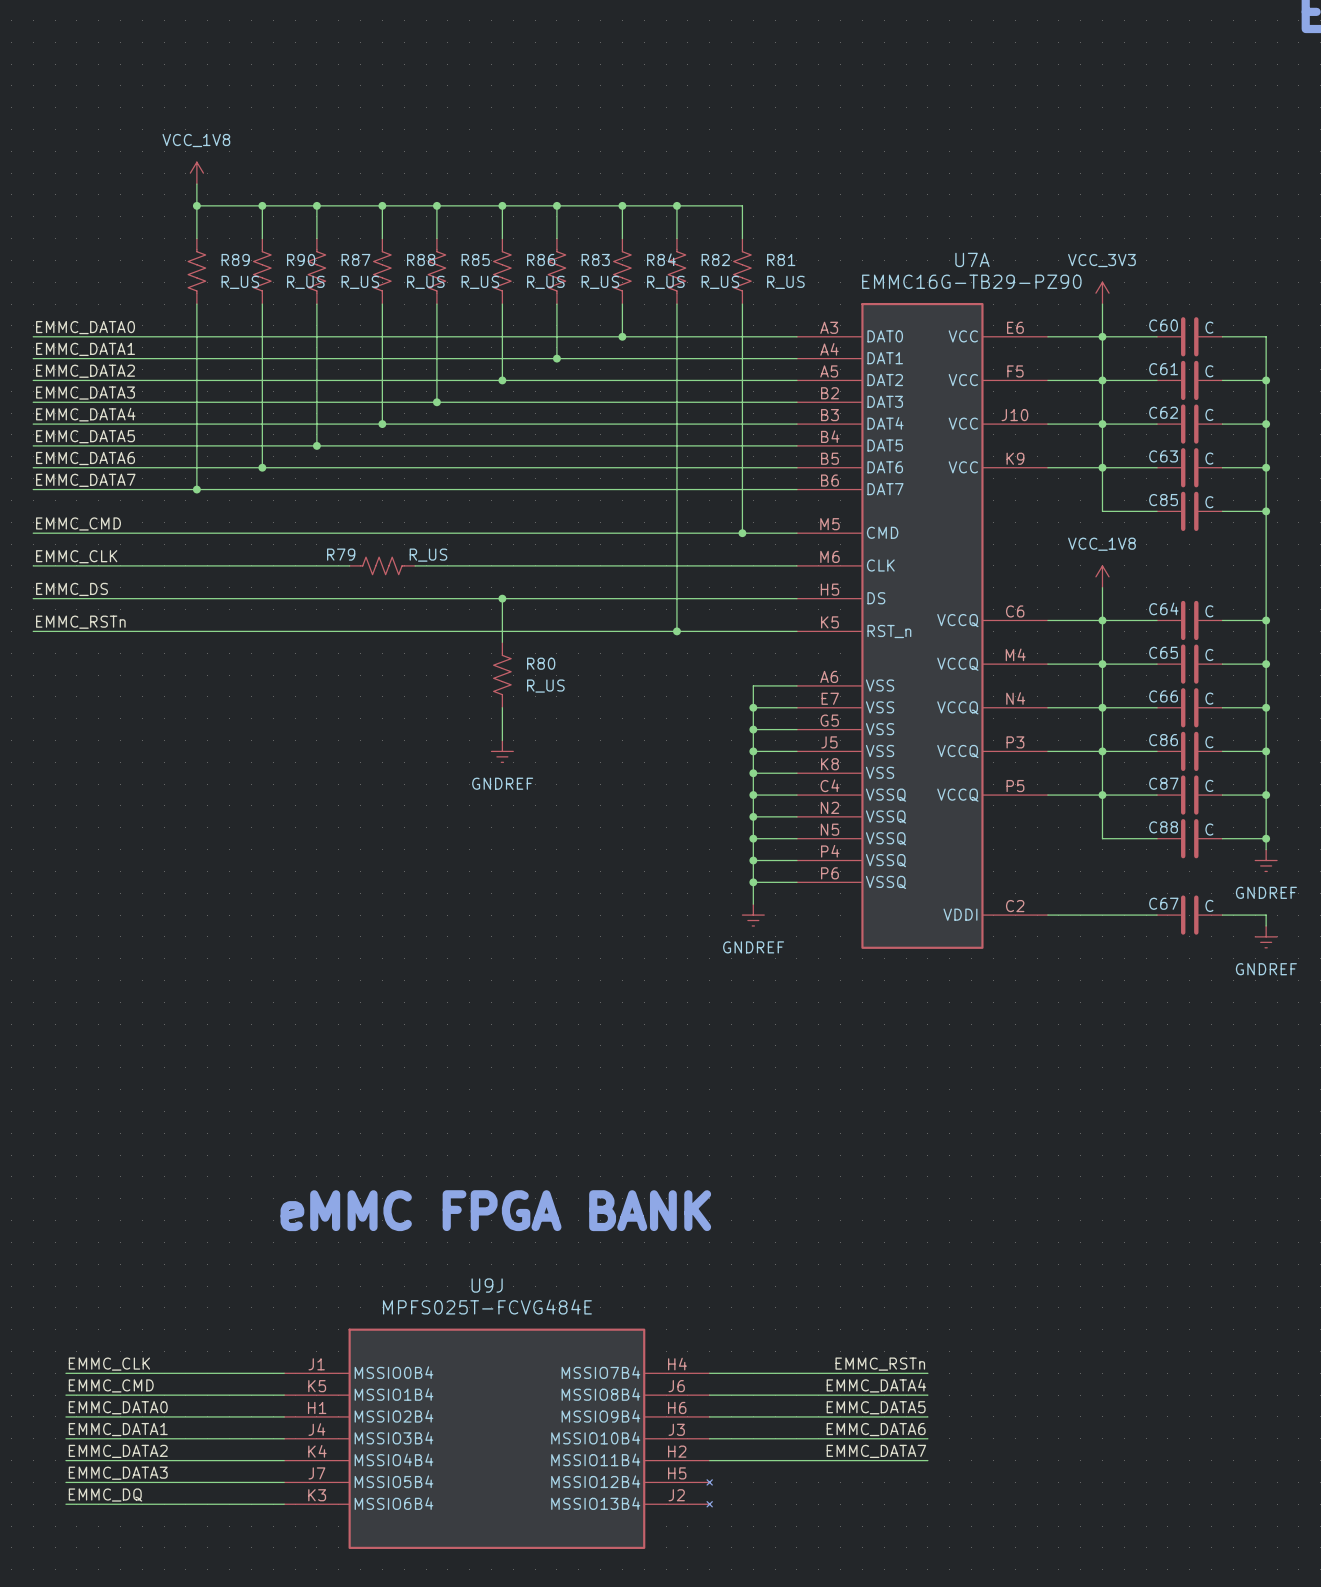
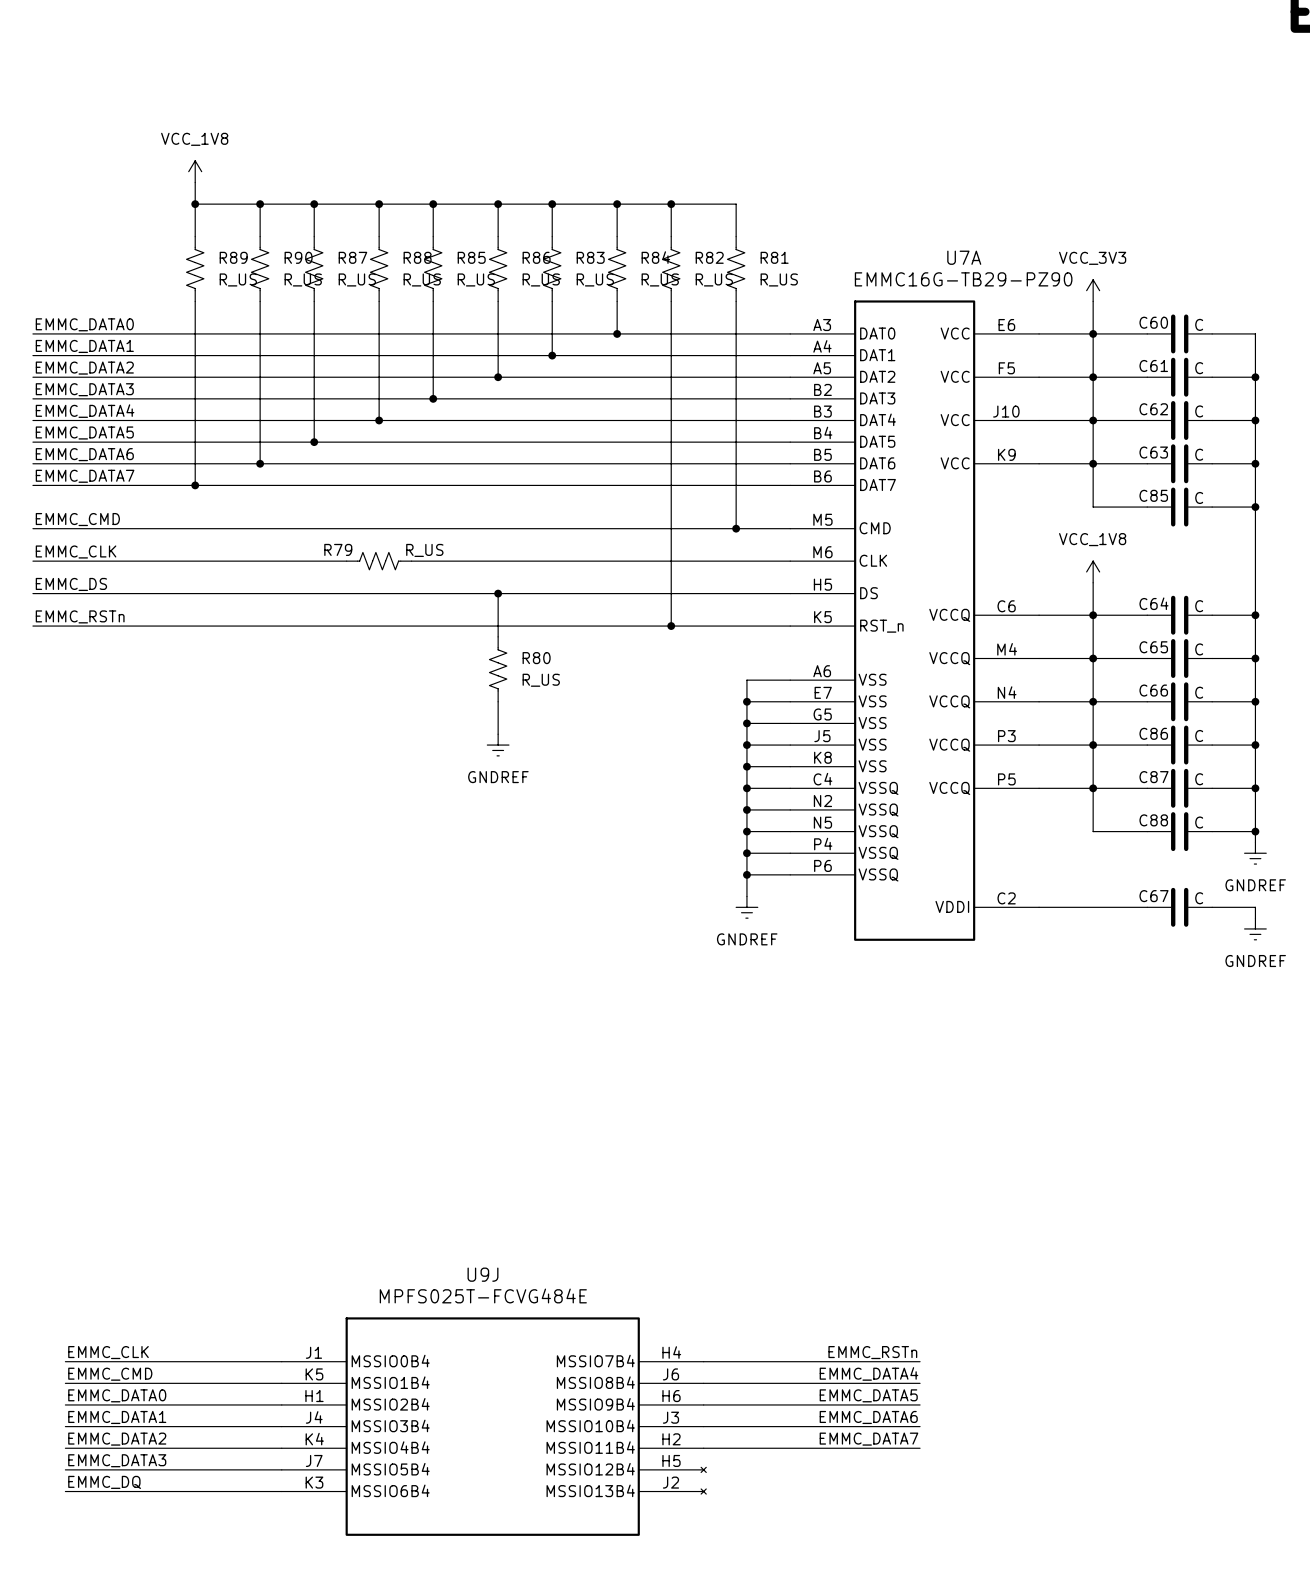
text: eMMC FPGA BANK (495, 1210) -> none

